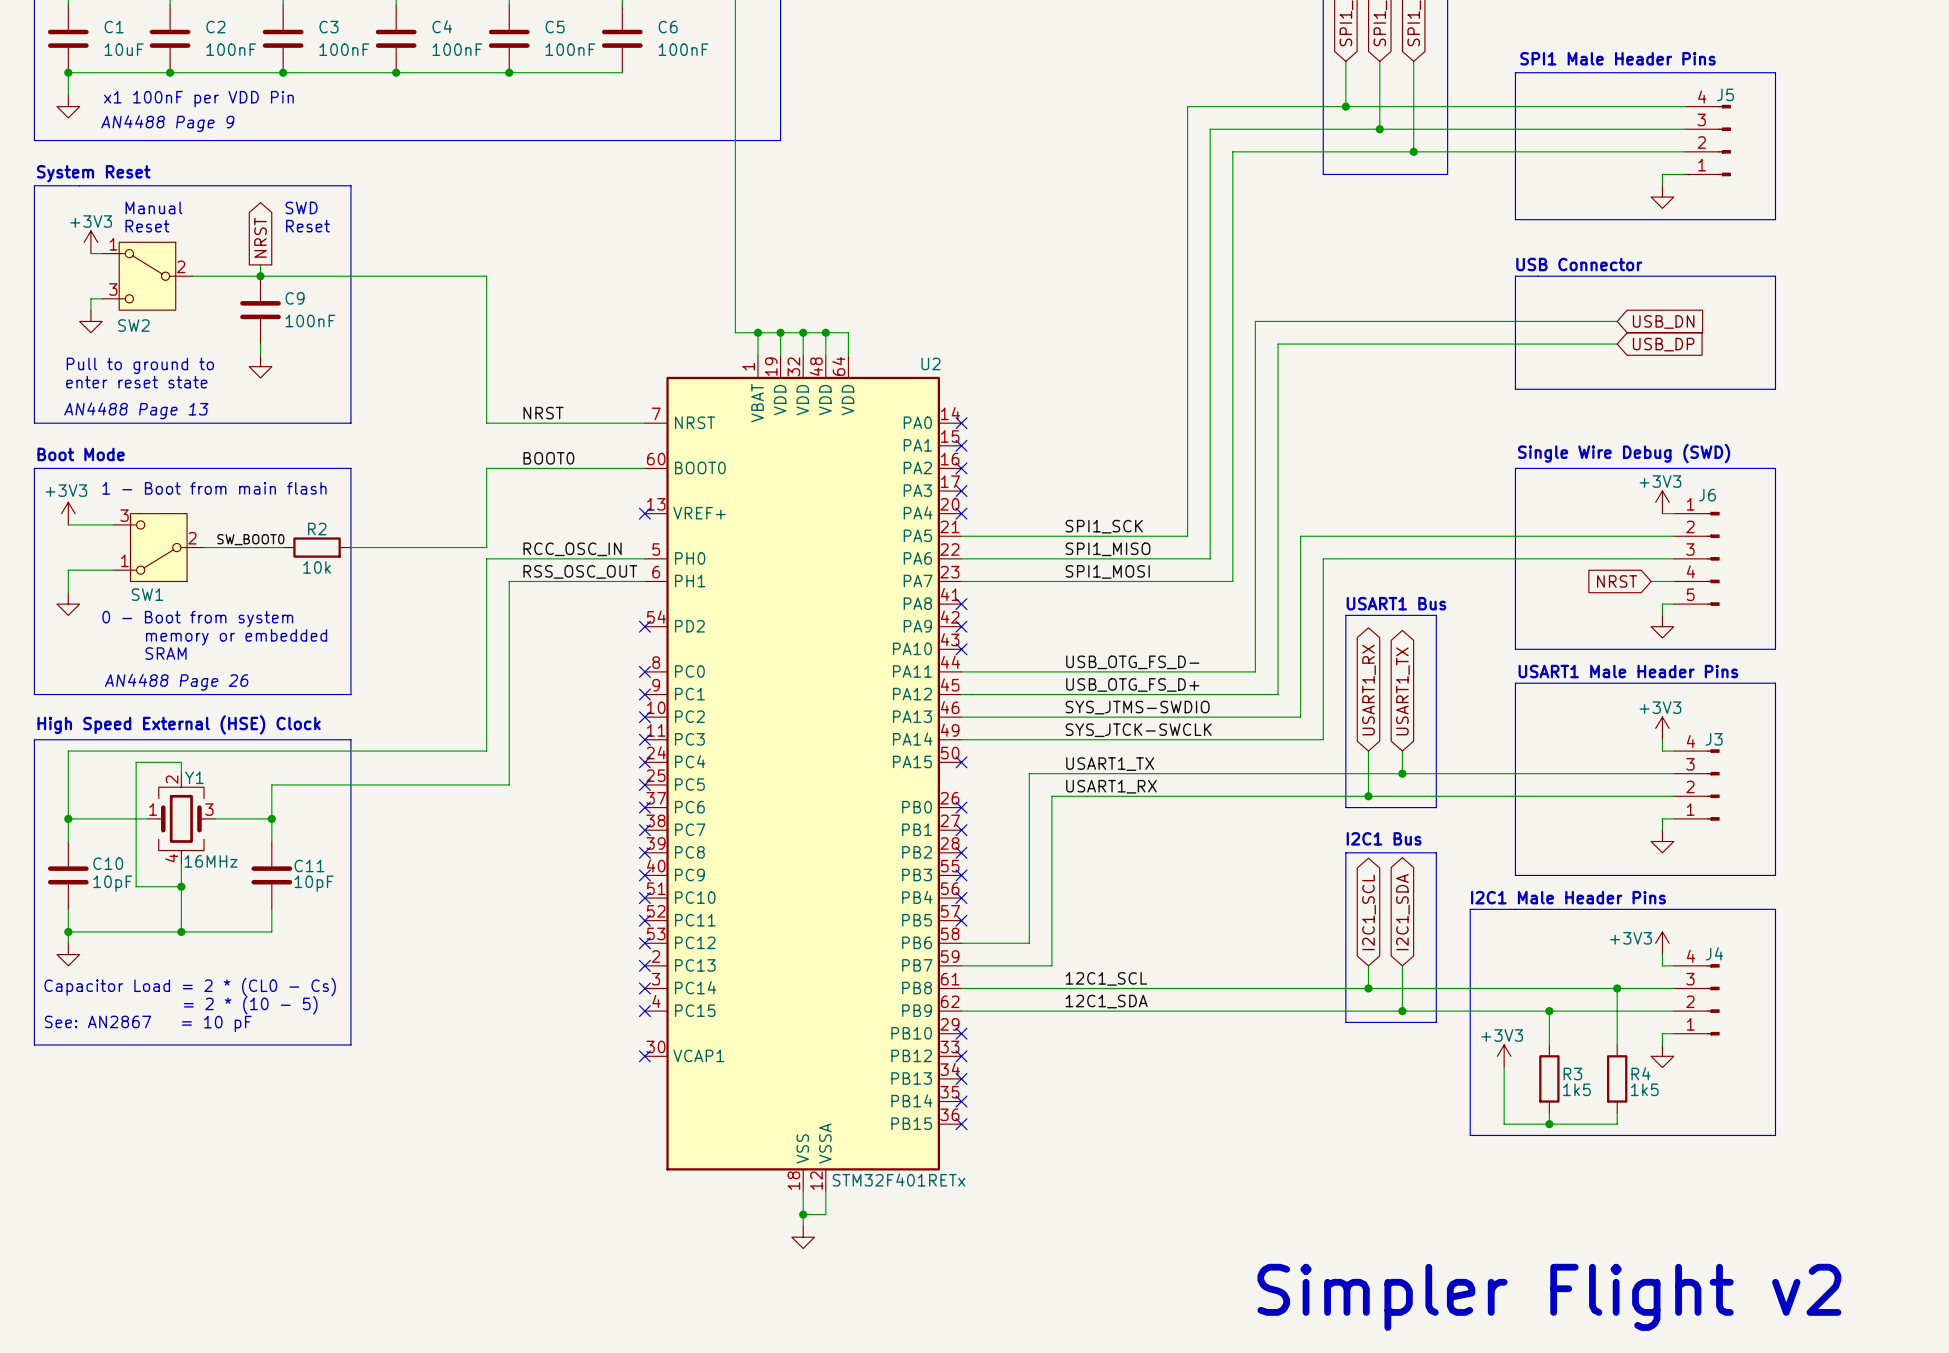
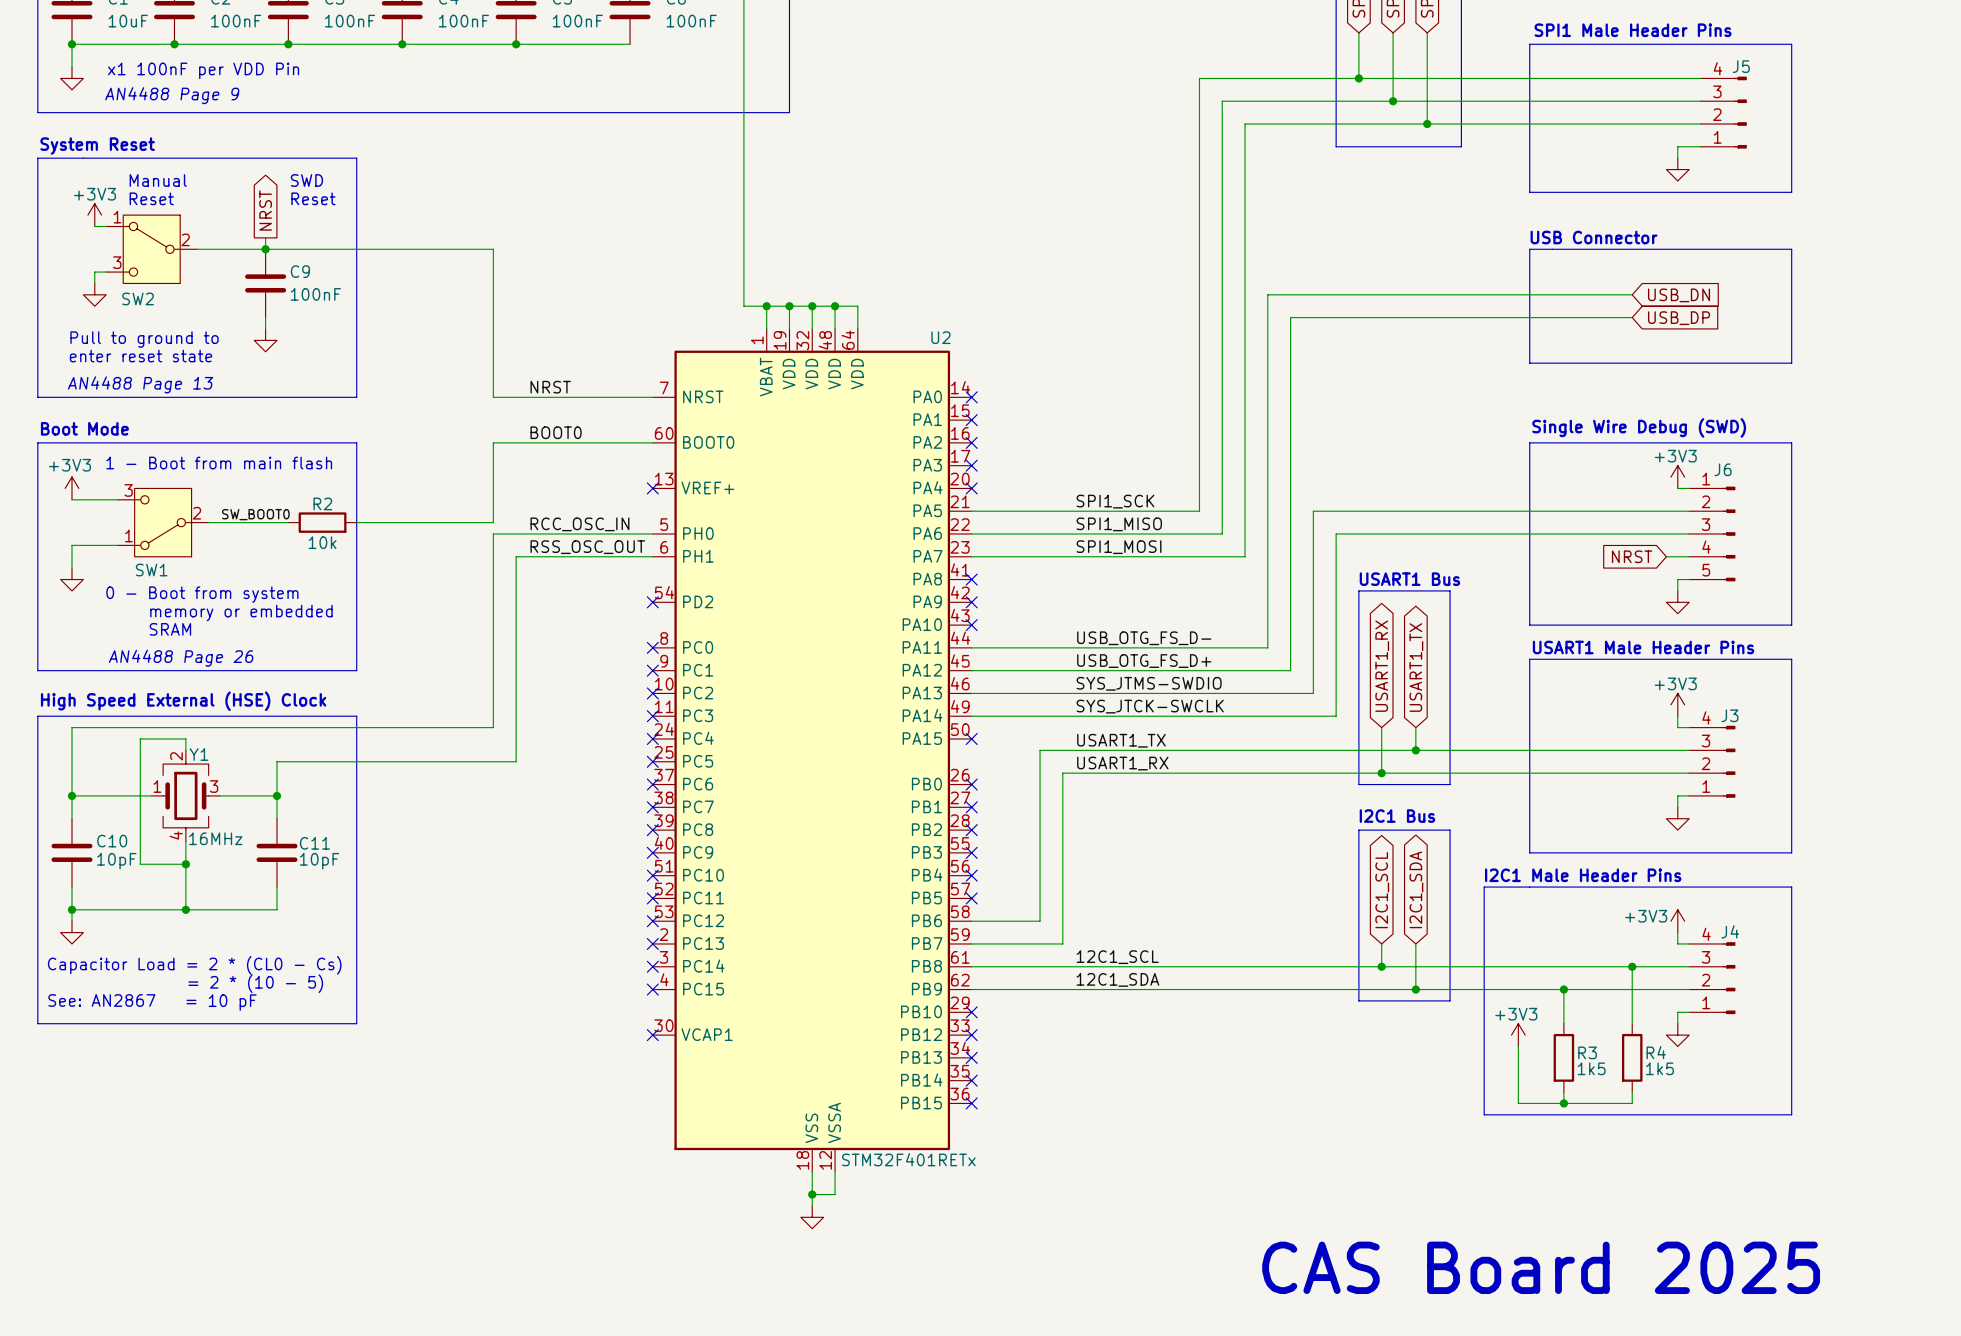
text: none -> CAS Board 2025 (1541, 1267)
text: Simpler Flight v2 (1549, 1297) -> none

